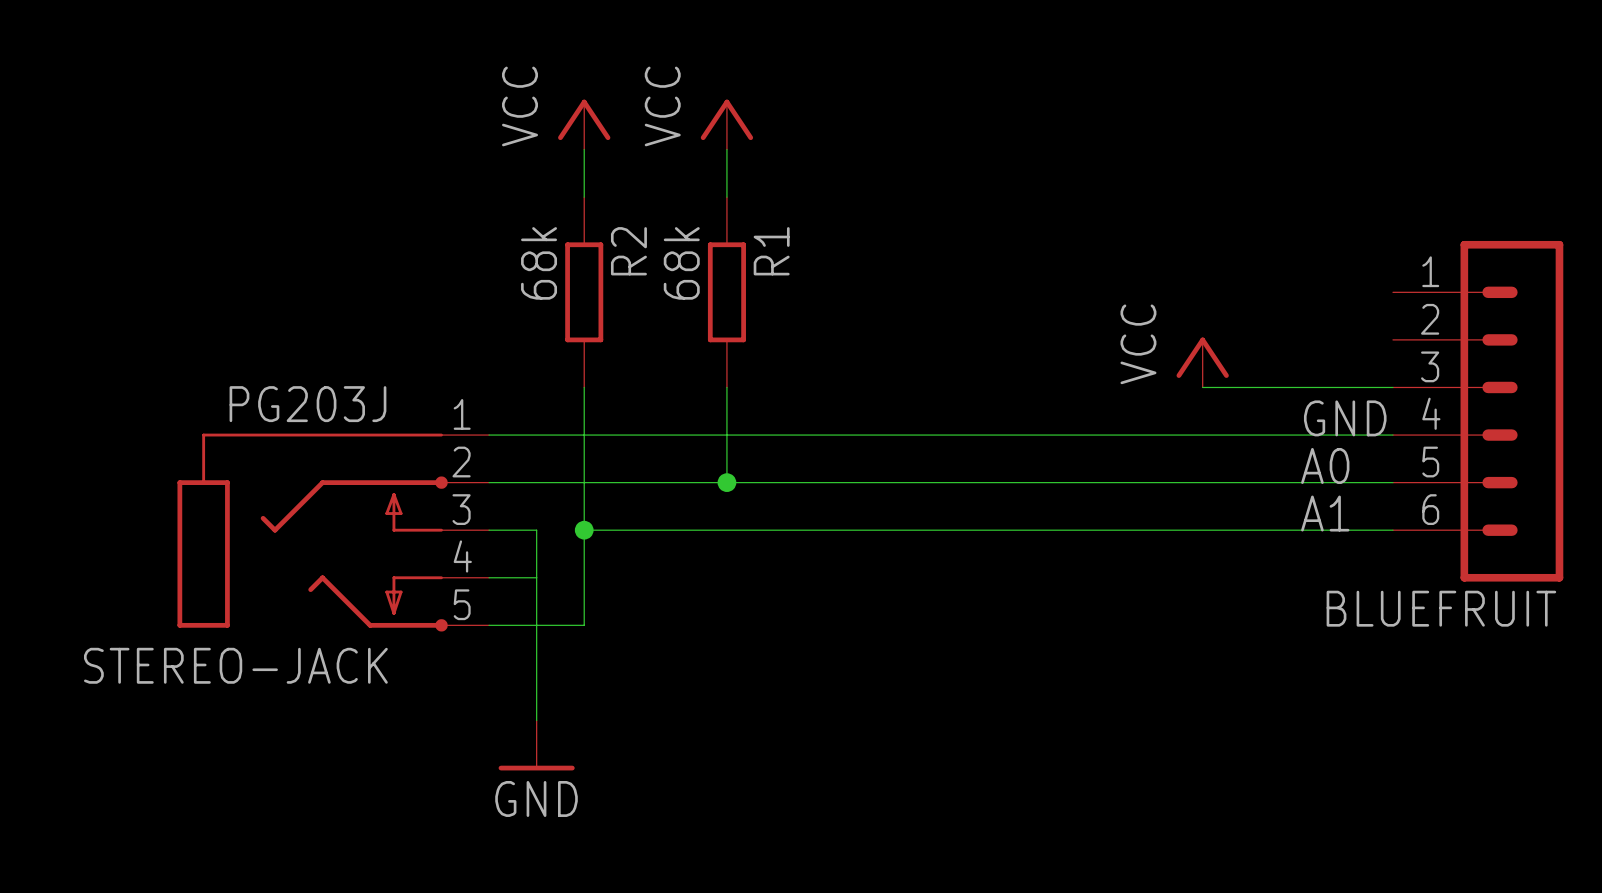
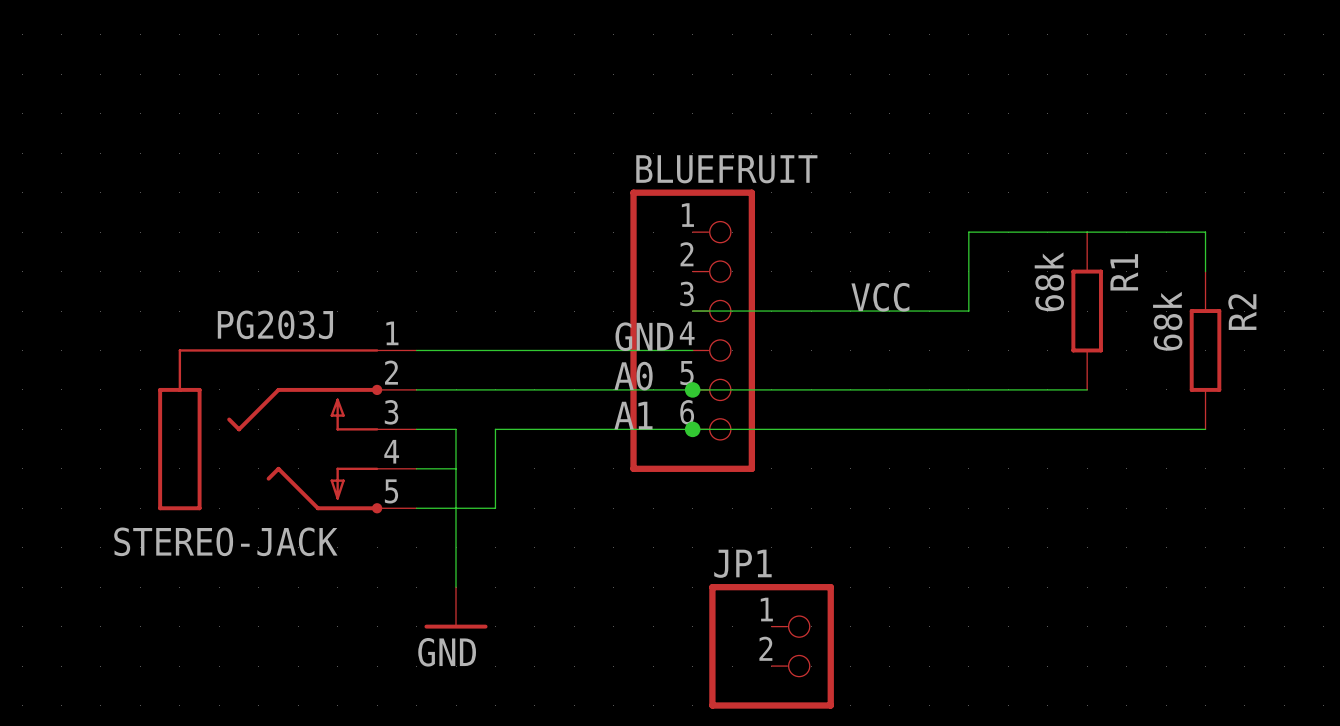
power symbol: VCC (584, 124) -> none
power symbol: VCC (726, 124) -> none
wire: (584, 149) (584, 197) -> none
wire: (726, 149) (726, 197) -> none
R2 position: (584, 292) -> (1205, 350)
R1 position: (726, 292) -> (1087, 311)
wire: none -> (1205, 271) (1205, 232) (968, 232) (968, 311) (692, 311)
power symbol: VCC (1202, 362) -> none
label: none -> VCC (880, 297)
wire: (584, 387) (584, 530) -> none
wire: (726, 387) (726, 482) -> none
wire: (1202, 387) (1392, 387) -> none
BLUEFRUIT: none -> (692, 330)
BLUEFRUIT: (1478, 411) -> none
label: none -> GND (644, 336)
label: GND (1345, 418) -> none
wire: (822, 435) (1392, 435) -> none
label: none -> A0 (633, 376)
label: A0 (1325, 465) -> none
junction: (726, 482) -> none
junction: none -> (692, 389)
wire: (1297, 482) (1392, 482) -> none
label: none -> A1 (633, 415)
label: A1 (1325, 513) -> none
junction: (584, 530) -> none
junction: none -> (692, 429)
JP1: none -> (771, 646)

